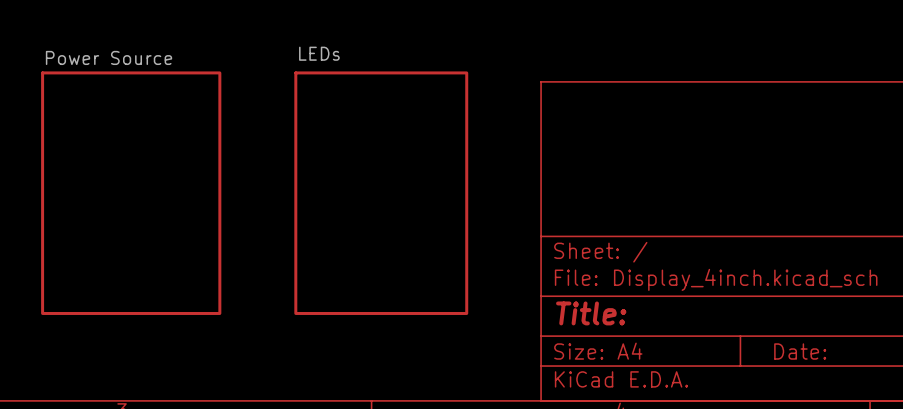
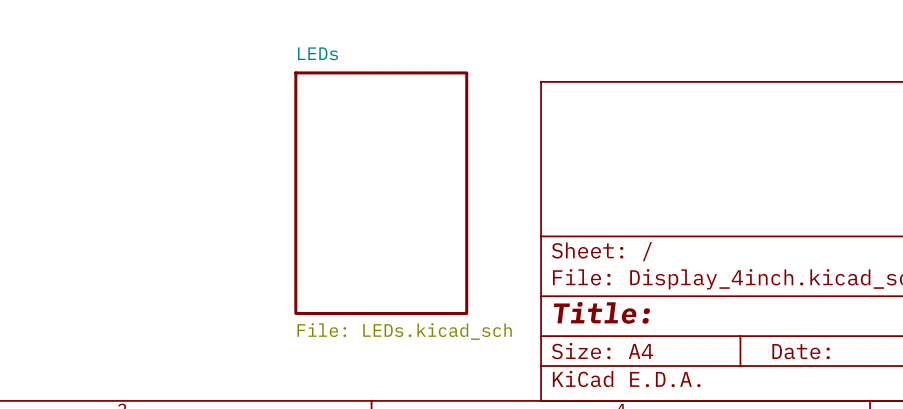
sheet Power Source: (131, 193) -> none
sheet LEDs value: none -> File: LEDs.kicad_sch (404, 331)

